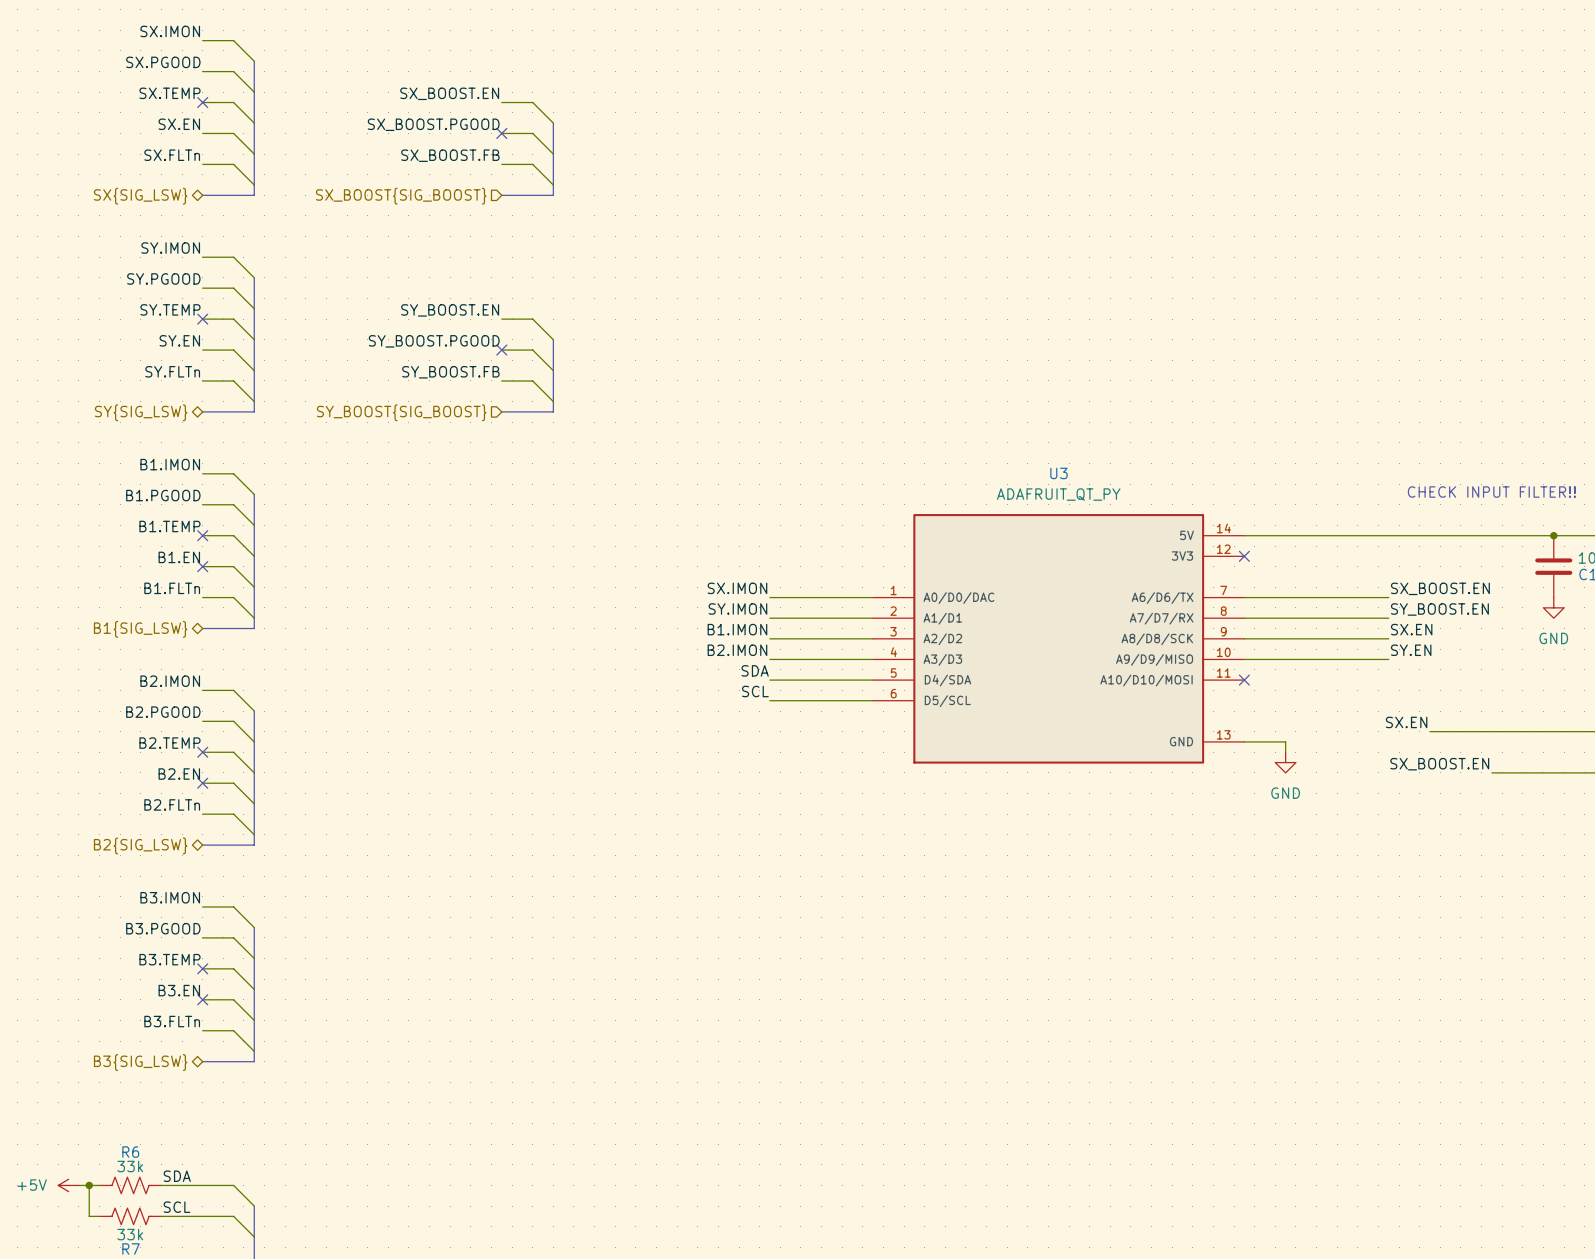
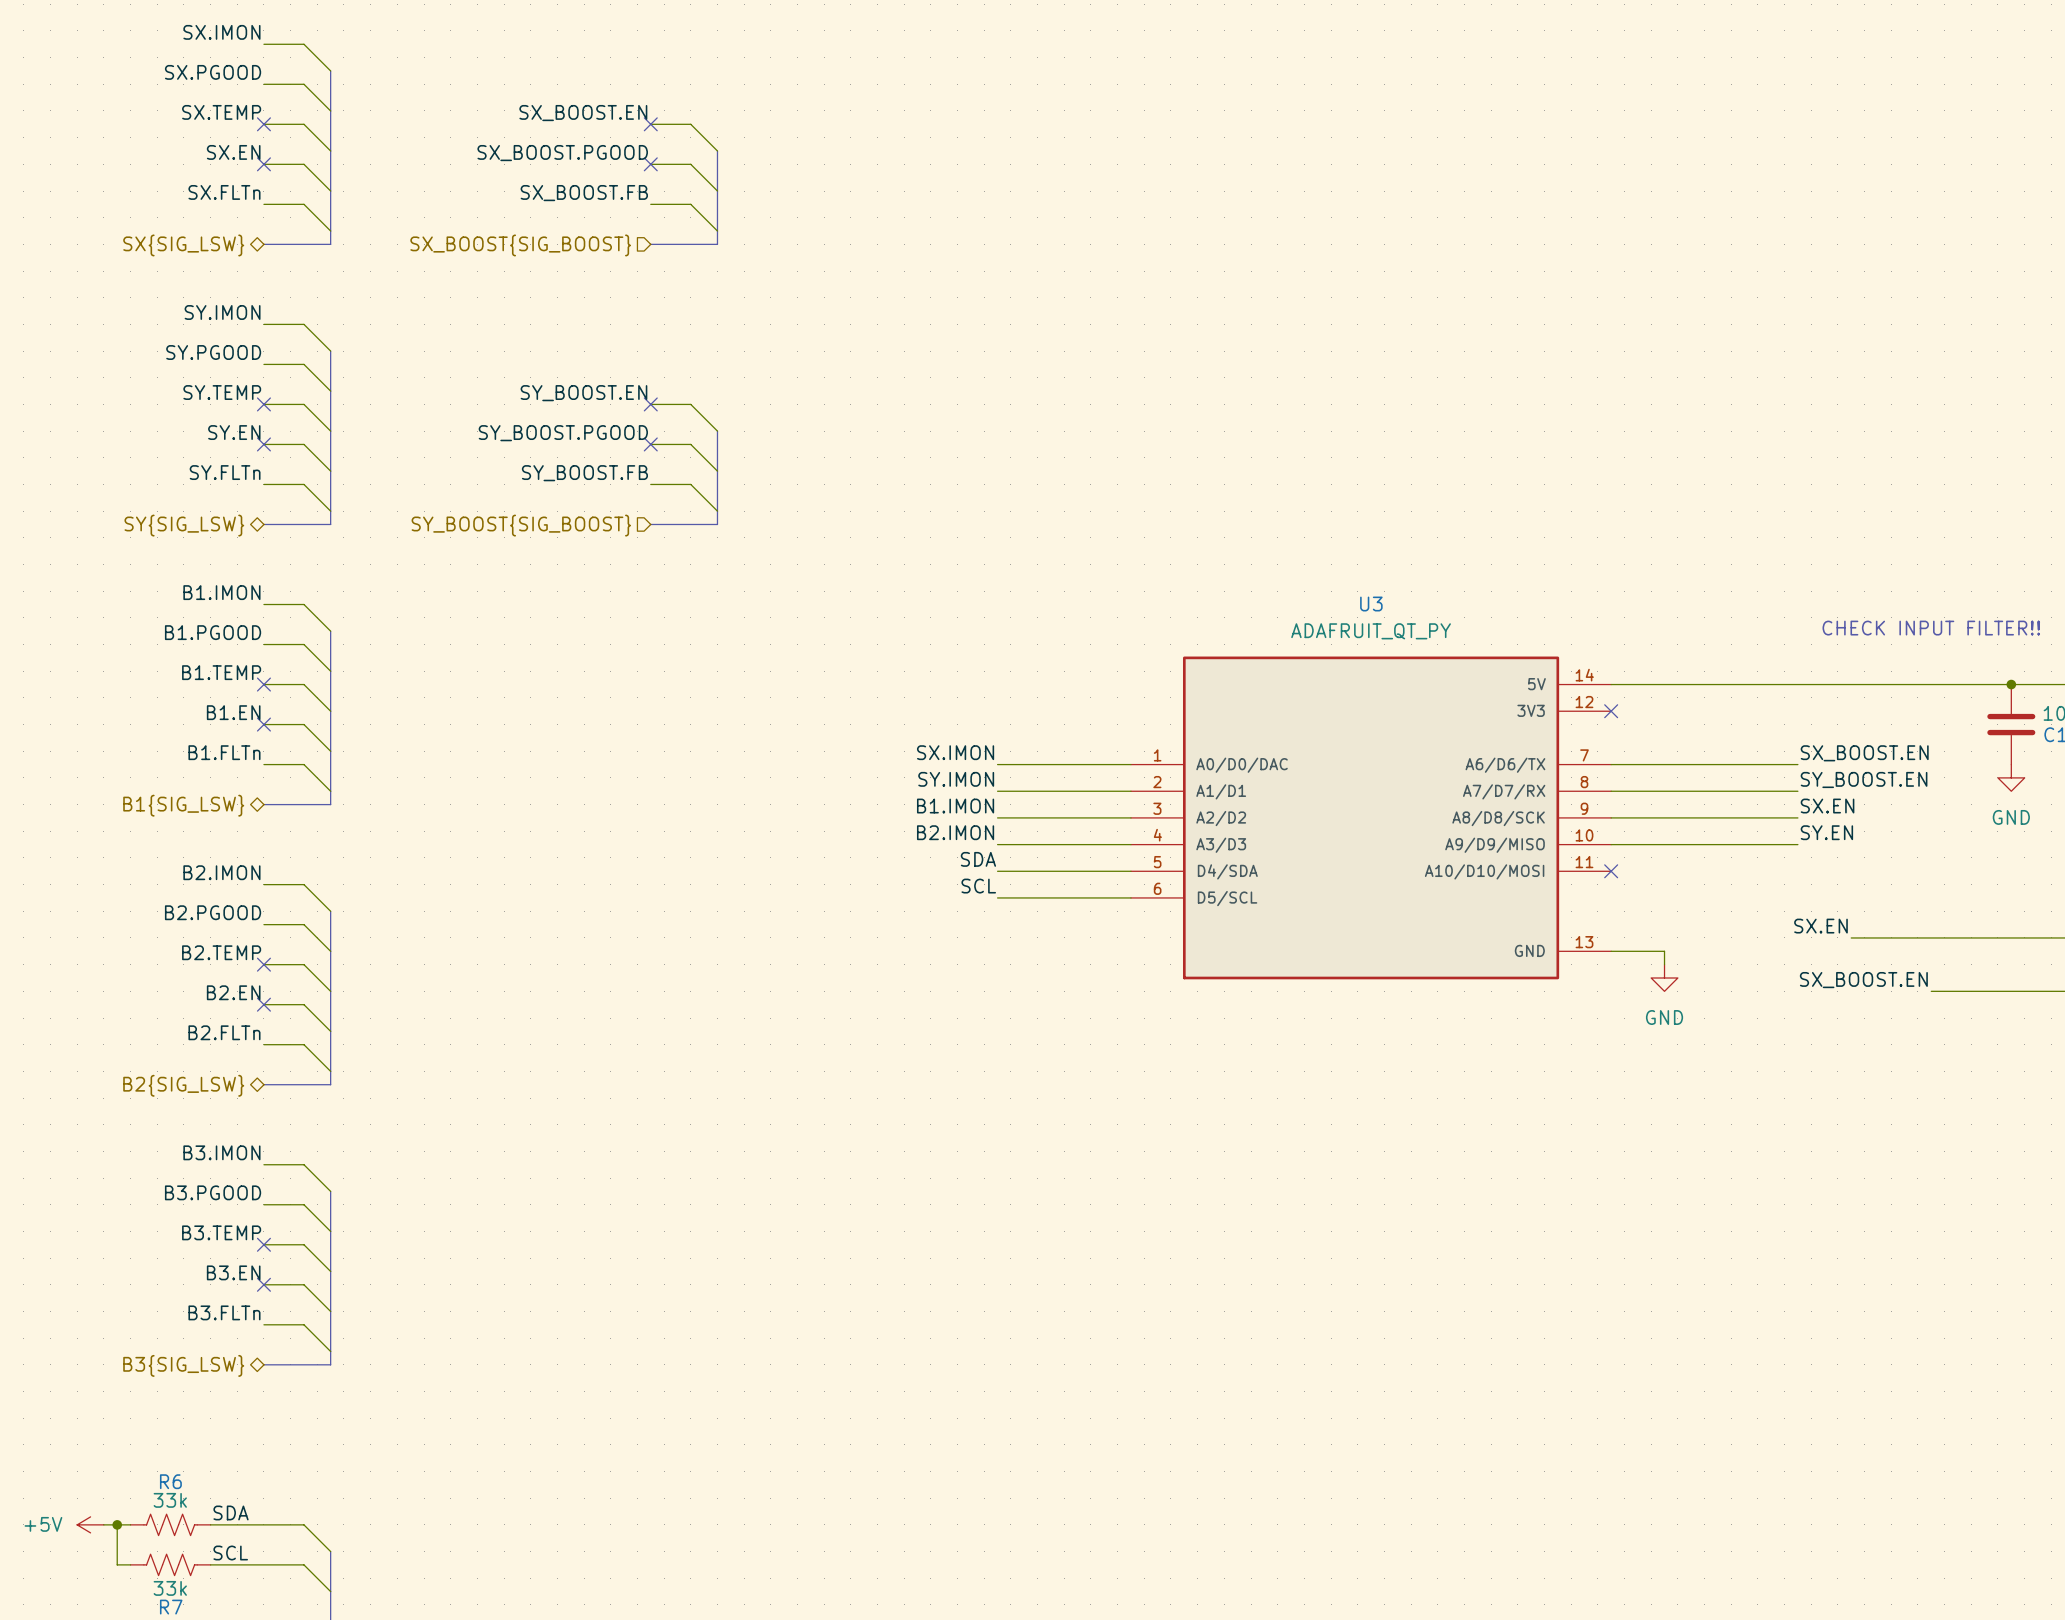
no-connect mark: none -> (650, 124)
no-connect mark: none -> (263, 164)
no-connect mark: none -> (650, 404)
no-connect mark: none -> (263, 444)

